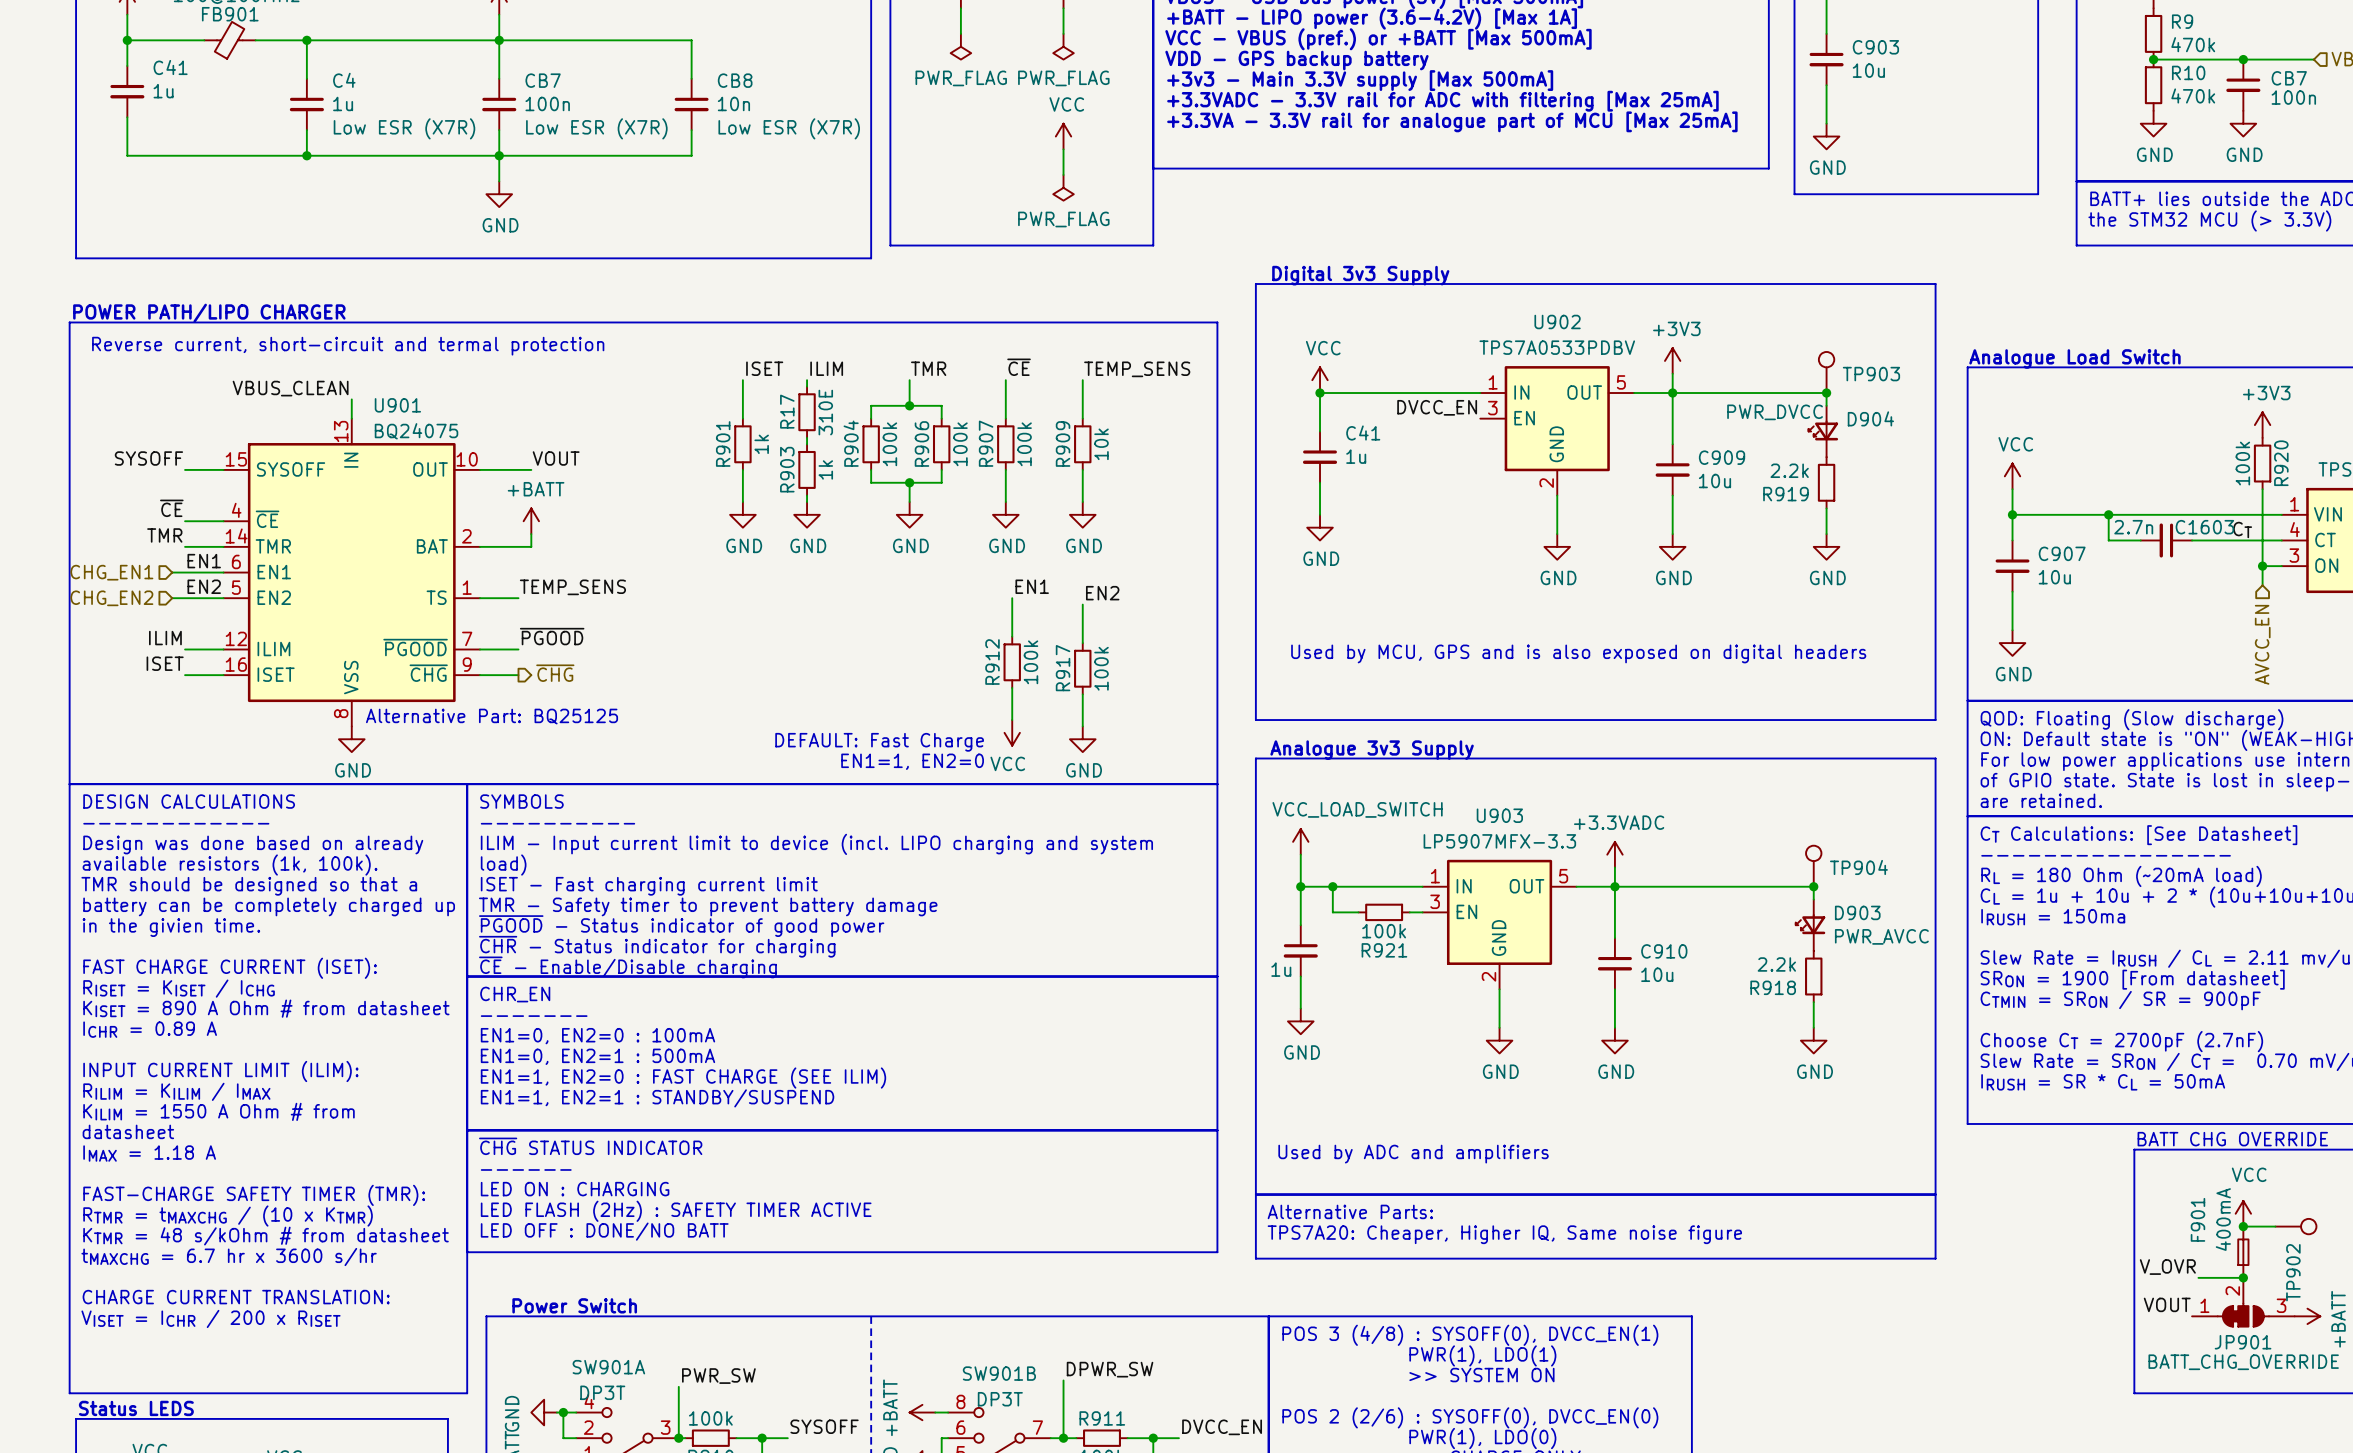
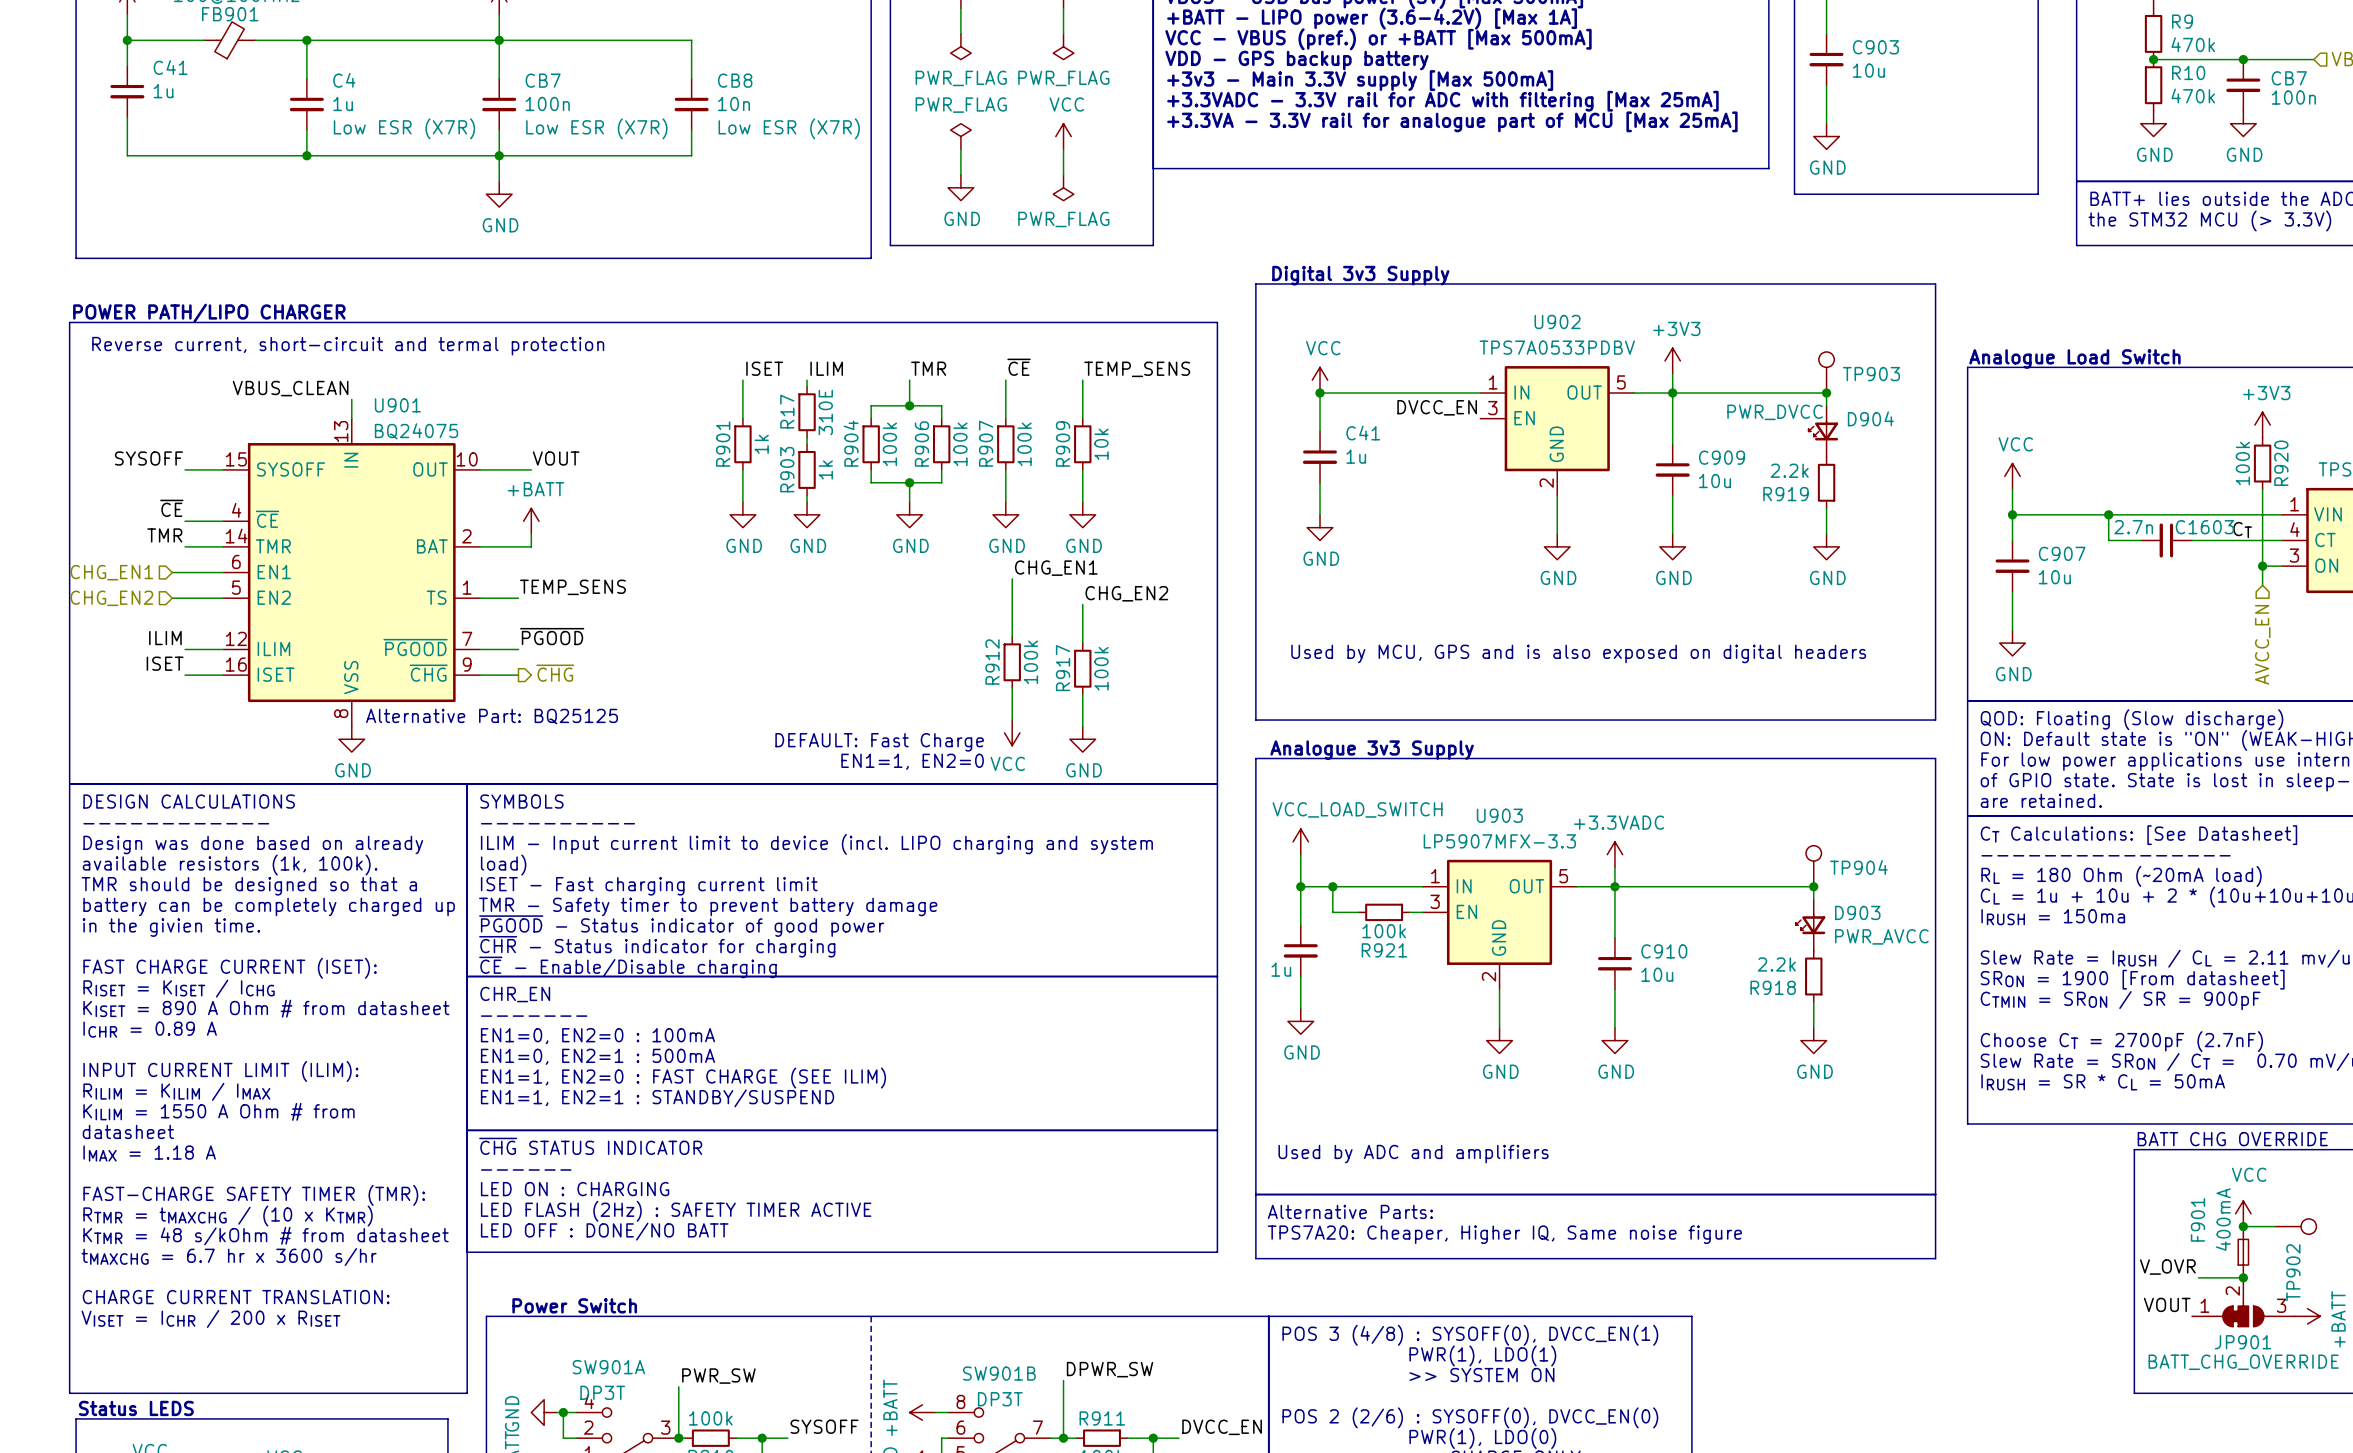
power symbol: none -> PWR_FLAG (960, 136)
wire: none -> (960, 149) (960, 174)
power symbol: none -> GND (960, 187)
label: EN1 (204, 561) -> none
label: none -> CHG_EN1 (1056, 568)
wire: none -> (1012, 578) (1012, 598)
label: EN2 (204, 586) -> none
label: EN1 (1032, 586) -> none
label: EN2 (1102, 593) -> CHG_EN2 (1126, 593)

